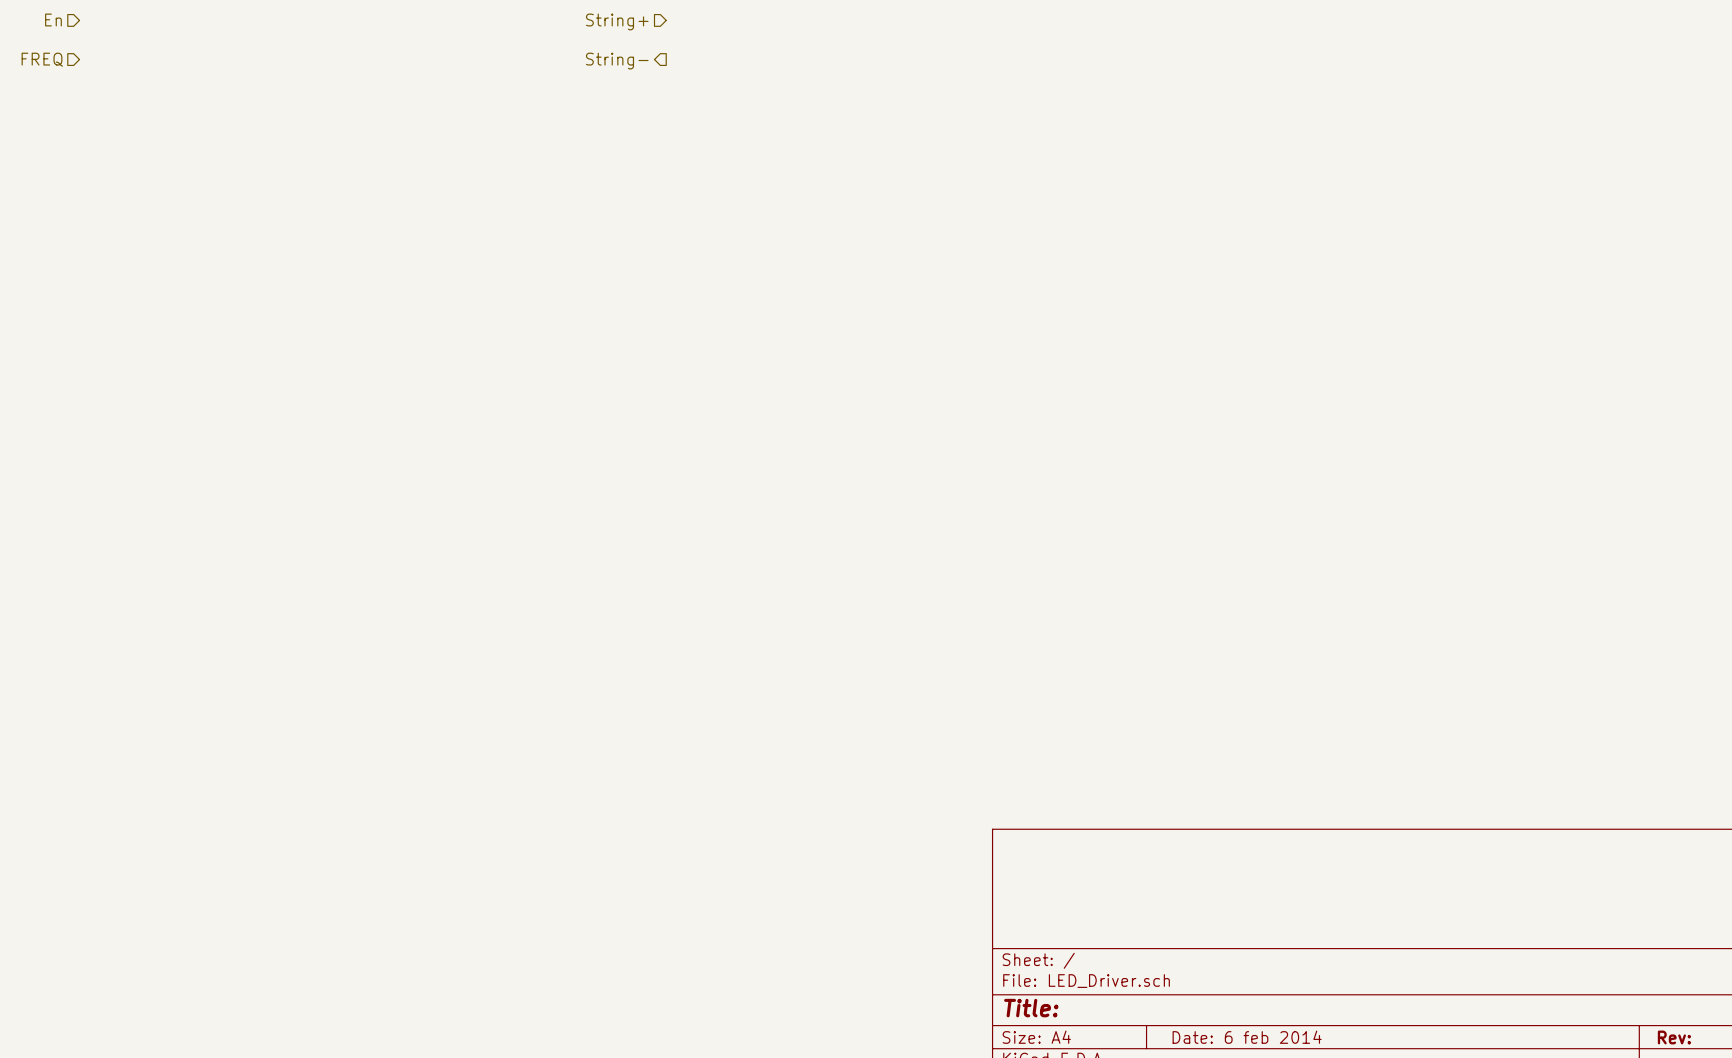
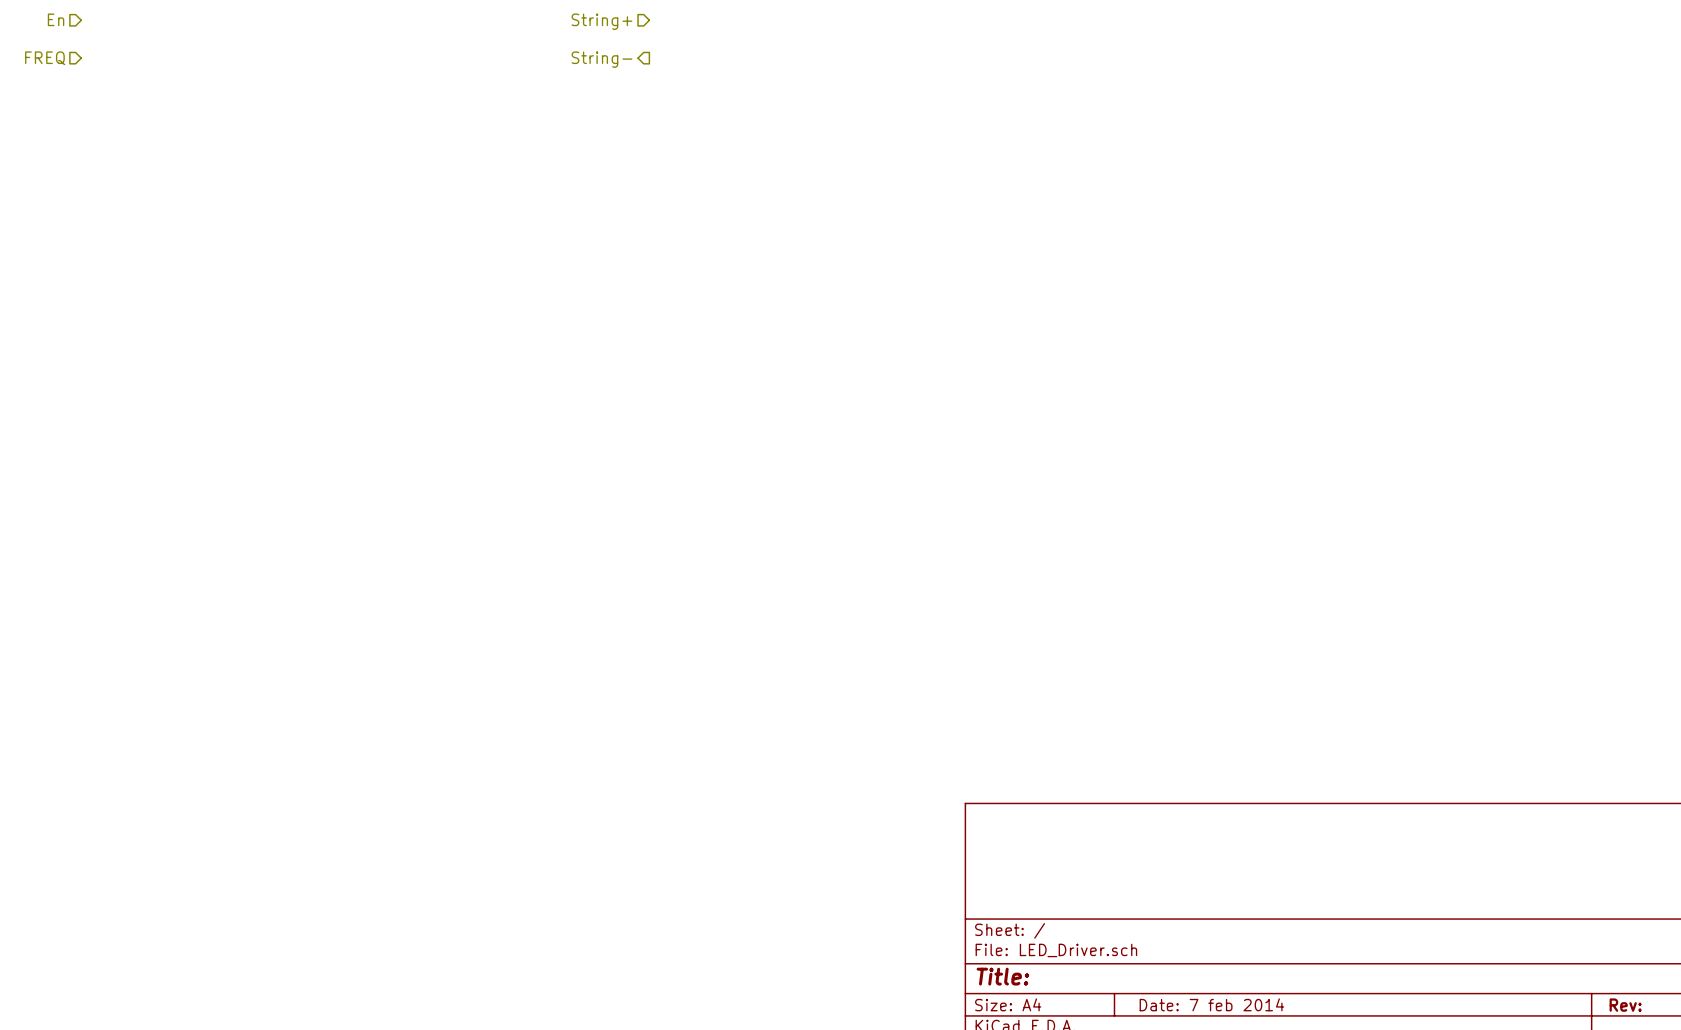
title block: Date: 6 feb 2014 (1247, 1037) -> Date: 7 feb 2014 (1211, 1004)

